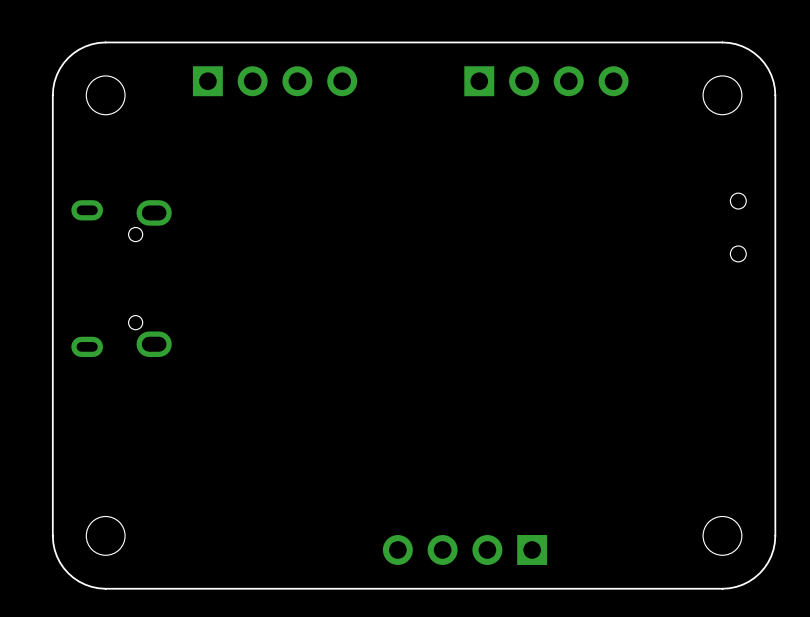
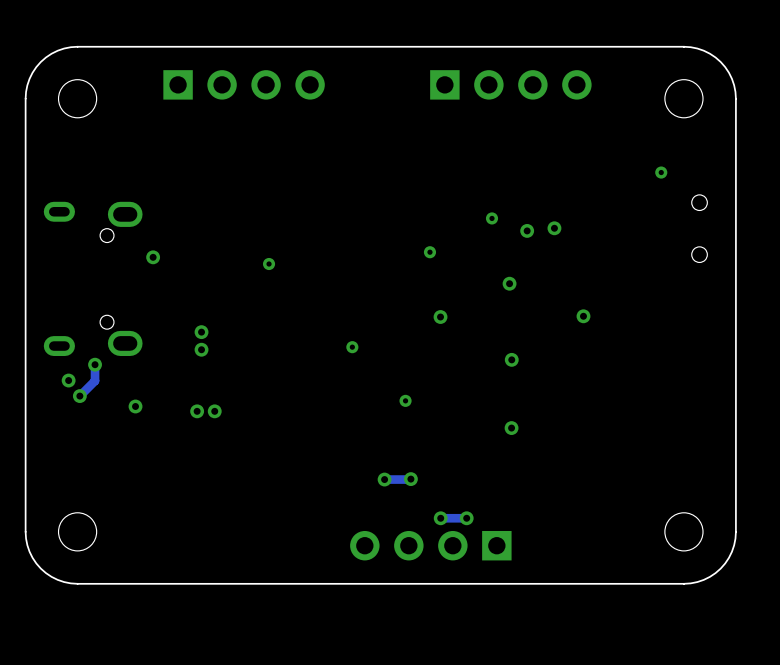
via: none -> (661, 172)
via: none -> (491, 218)
via: none -> (554, 228)
via: none -> (527, 230)
via: none -> (429, 252)
via: none -> (153, 257)
via: none -> (269, 264)
via: none -> (509, 283)
via: none -> (583, 316)
via: none -> (440, 317)
via: none -> (201, 332)
via: none -> (352, 347)
via: none -> (201, 349)
via: none -> (511, 359)
track: none -> (95, 364) (95, 380) (79, 396)
via: none -> (95, 364)
via: none -> (68, 380)
via: none -> (79, 396)
via: none -> (405, 400)
via: none -> (135, 406)
via: none -> (197, 411)
via: none -> (214, 411)
via: none -> (511, 428)
via: none -> (384, 479)
track: none -> (410, 479) (384, 479)
via: none -> (410, 479)
via: none -> (440, 518)
track: none -> (466, 518) (440, 518)
via: none -> (466, 518)

